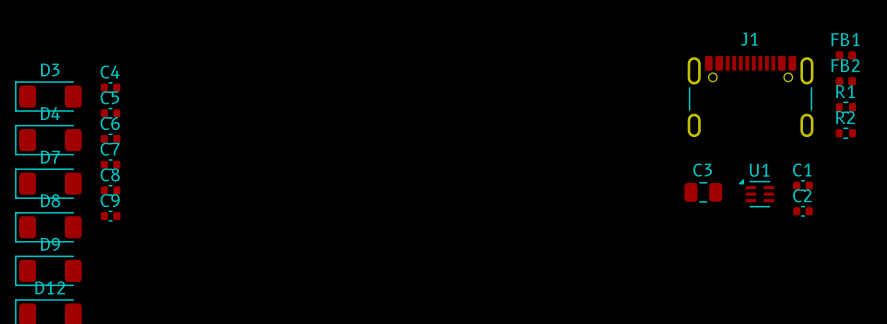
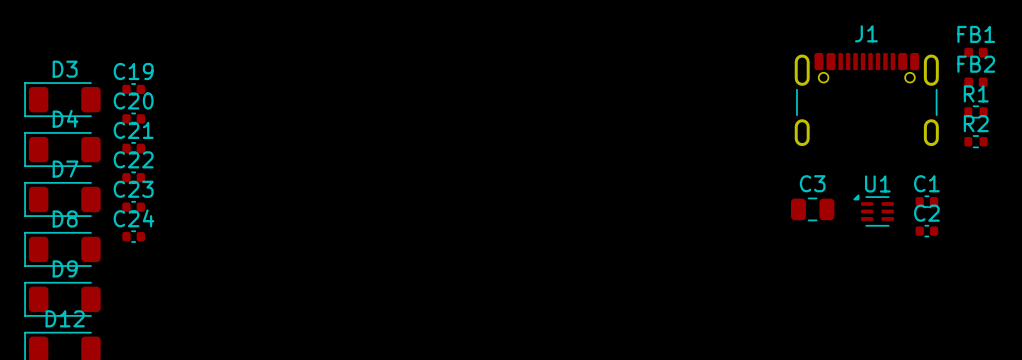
C4 name: C4 (110, 72) -> C19 (133, 71)
C5 name: C5 (109, 97) -> C20 (133, 100)
C6 name: C6 (110, 123) -> C21 (133, 130)
C7 name: C7 (110, 149) -> C22 (133, 159)
C8 name: C8 (110, 174) -> C23 (133, 189)
C9 name: C9 (110, 200) -> C24 (133, 218)

